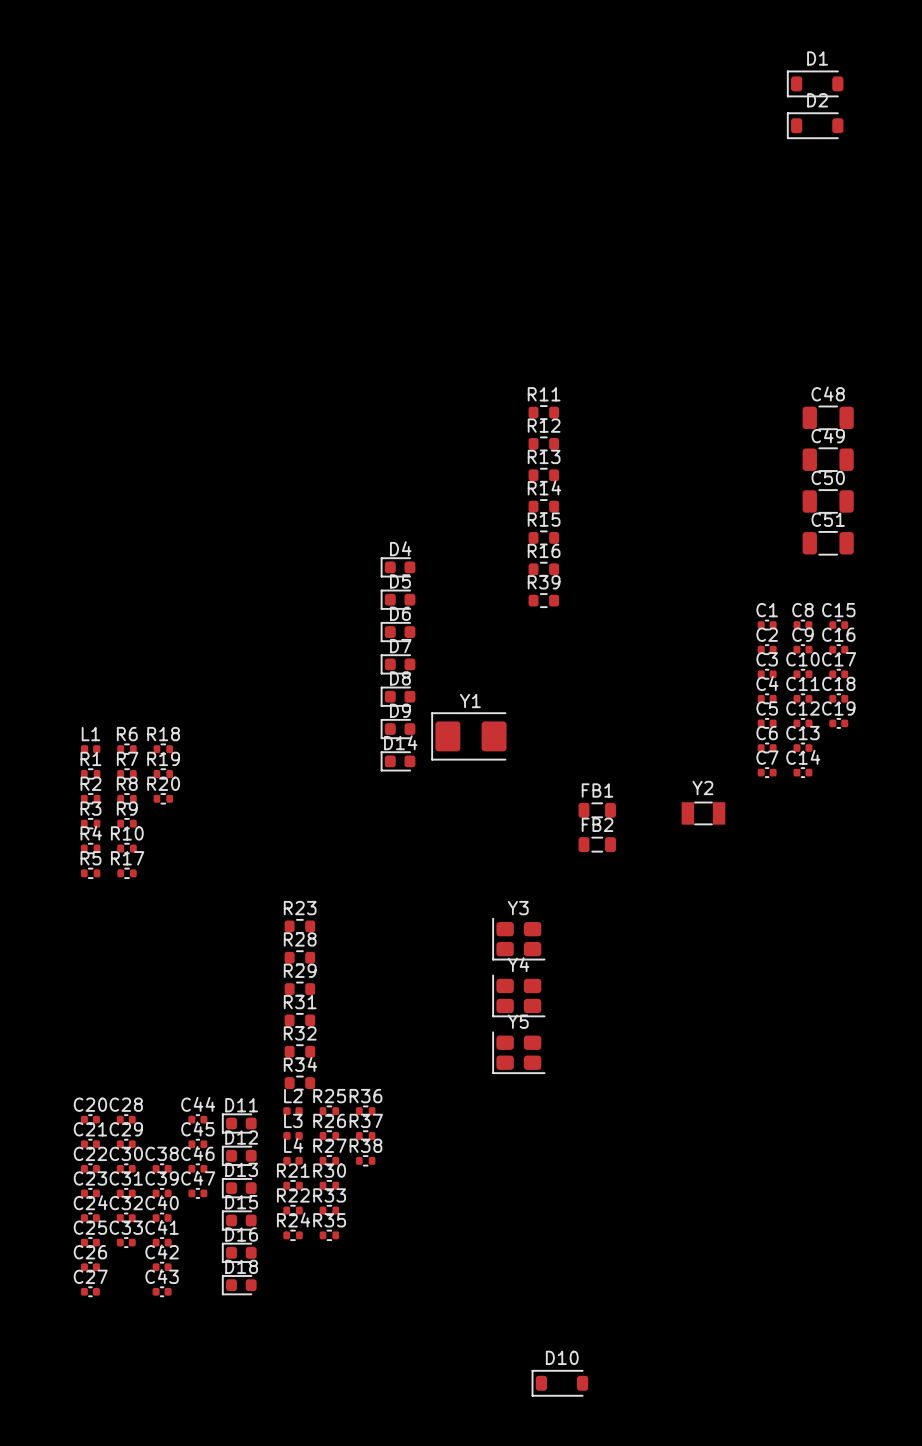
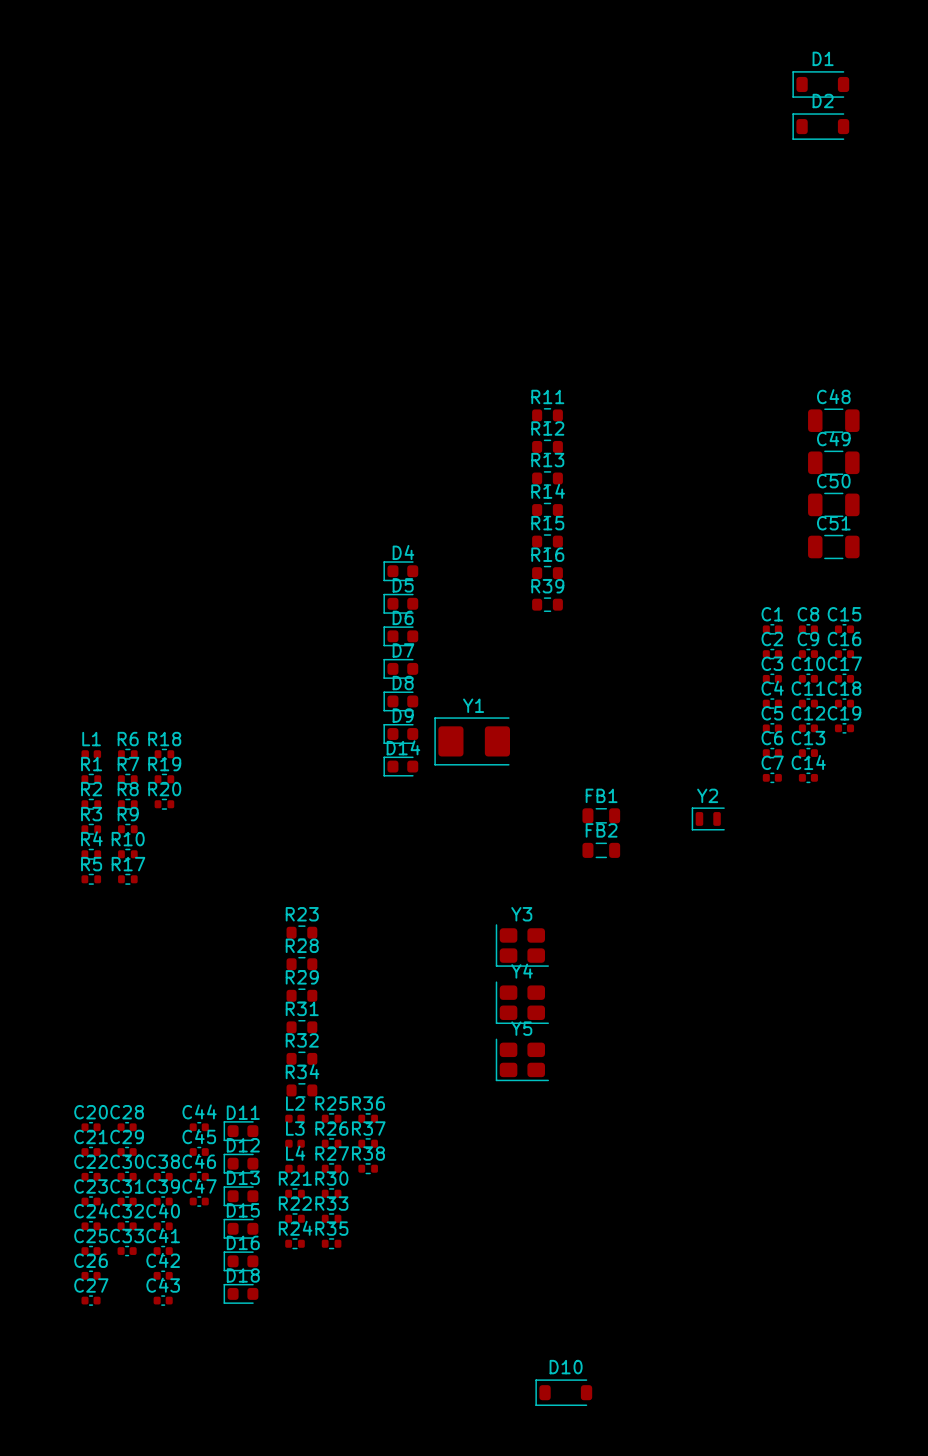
Y2 footprint: [681, 801, 726, 826] -> [691, 807, 725, 831]

